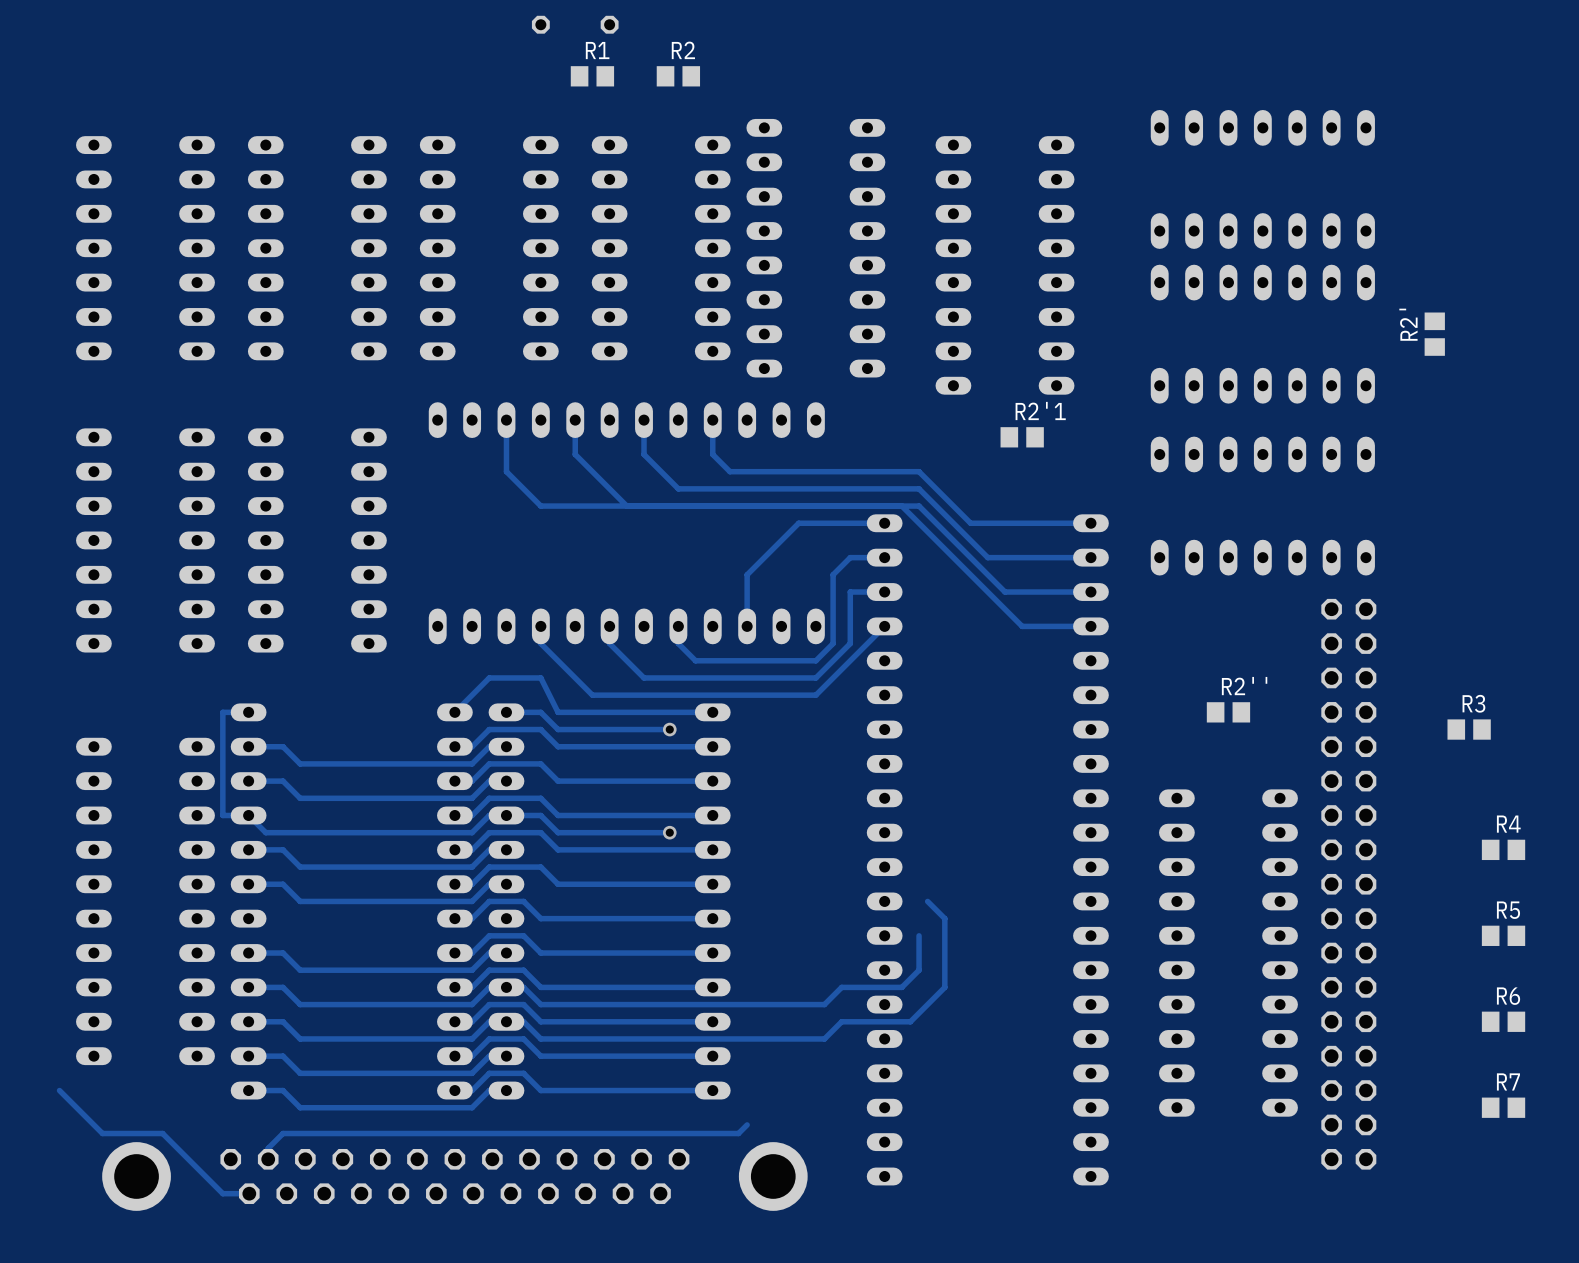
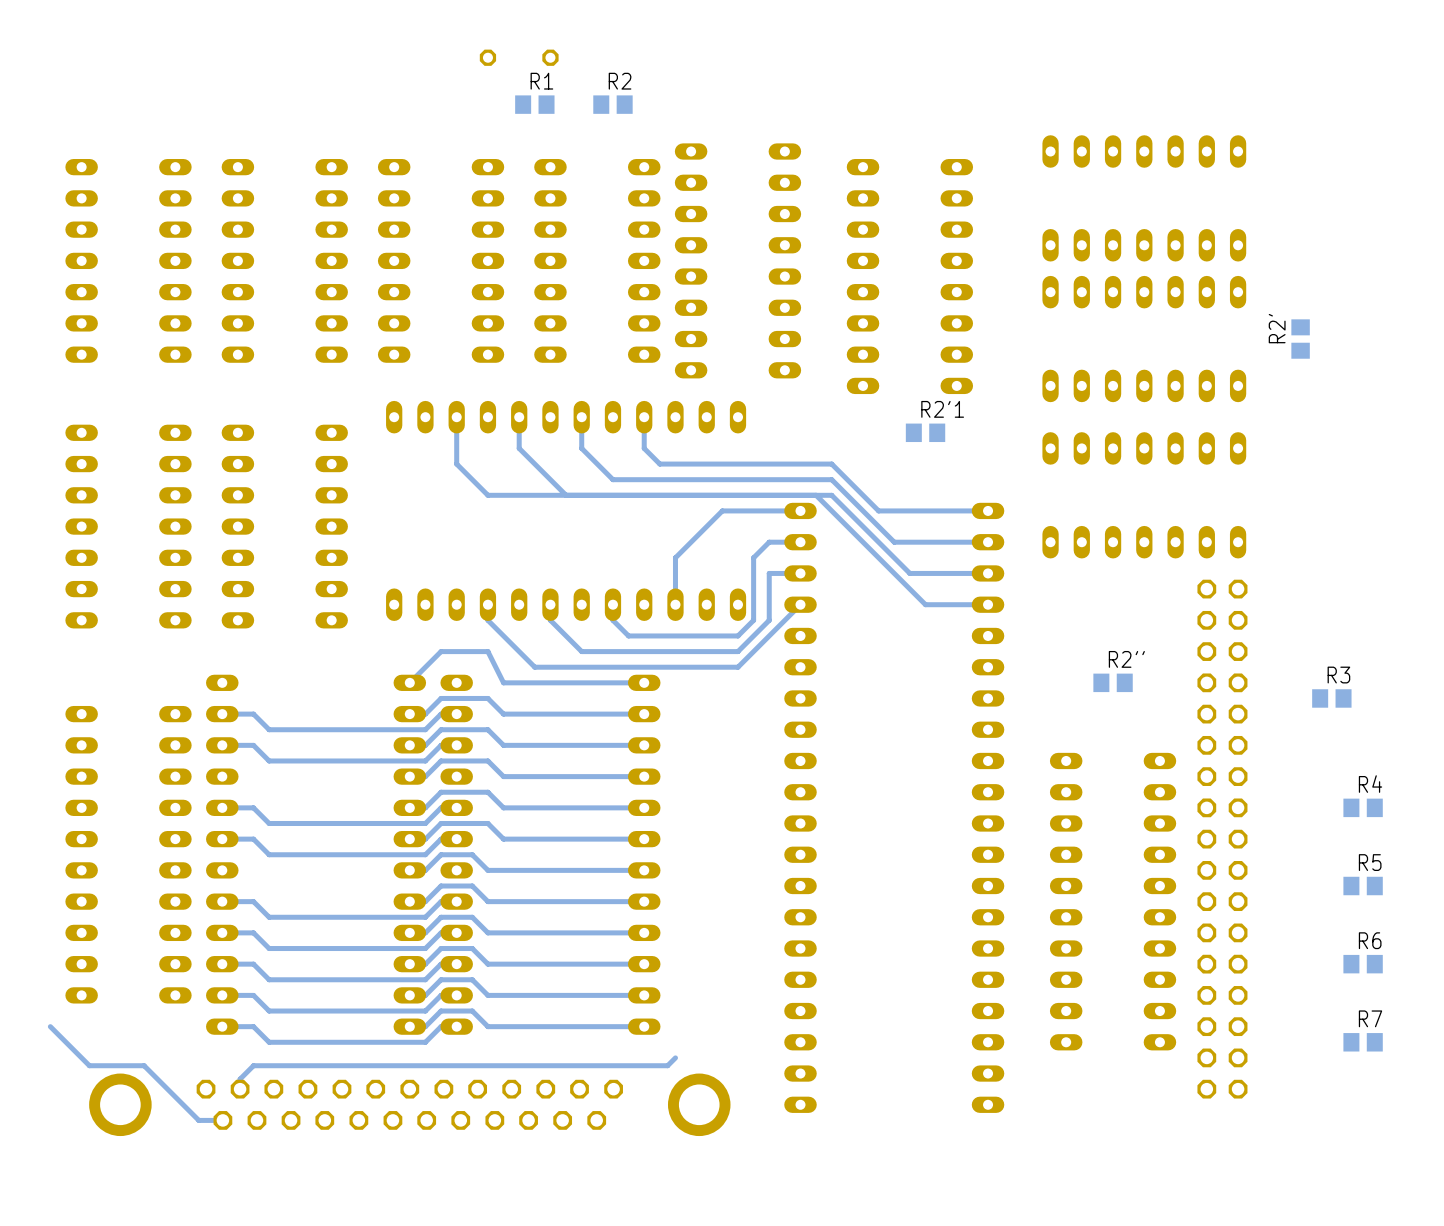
track: (248, 712) (222, 712) (222, 815) (248, 815) (265, 832) (472, 832) (489, 815) (540, 815) (558, 832) (669, 832) -> none
track: (506, 712) (540, 712) (558, 729) (669, 729) -> none
via: (669, 729) -> none
via: (669, 832) -> none
track: (927, 901) (944, 918) (944, 987) (910, 1021) (841, 1021) (824, 1038) (540, 1038) (523, 1021) (506, 1021) -> none
track: (919, 935) (919, 970) (901, 987) (841, 987) (824, 1004) (540, 1004) (523, 987) (506, 987) -> none

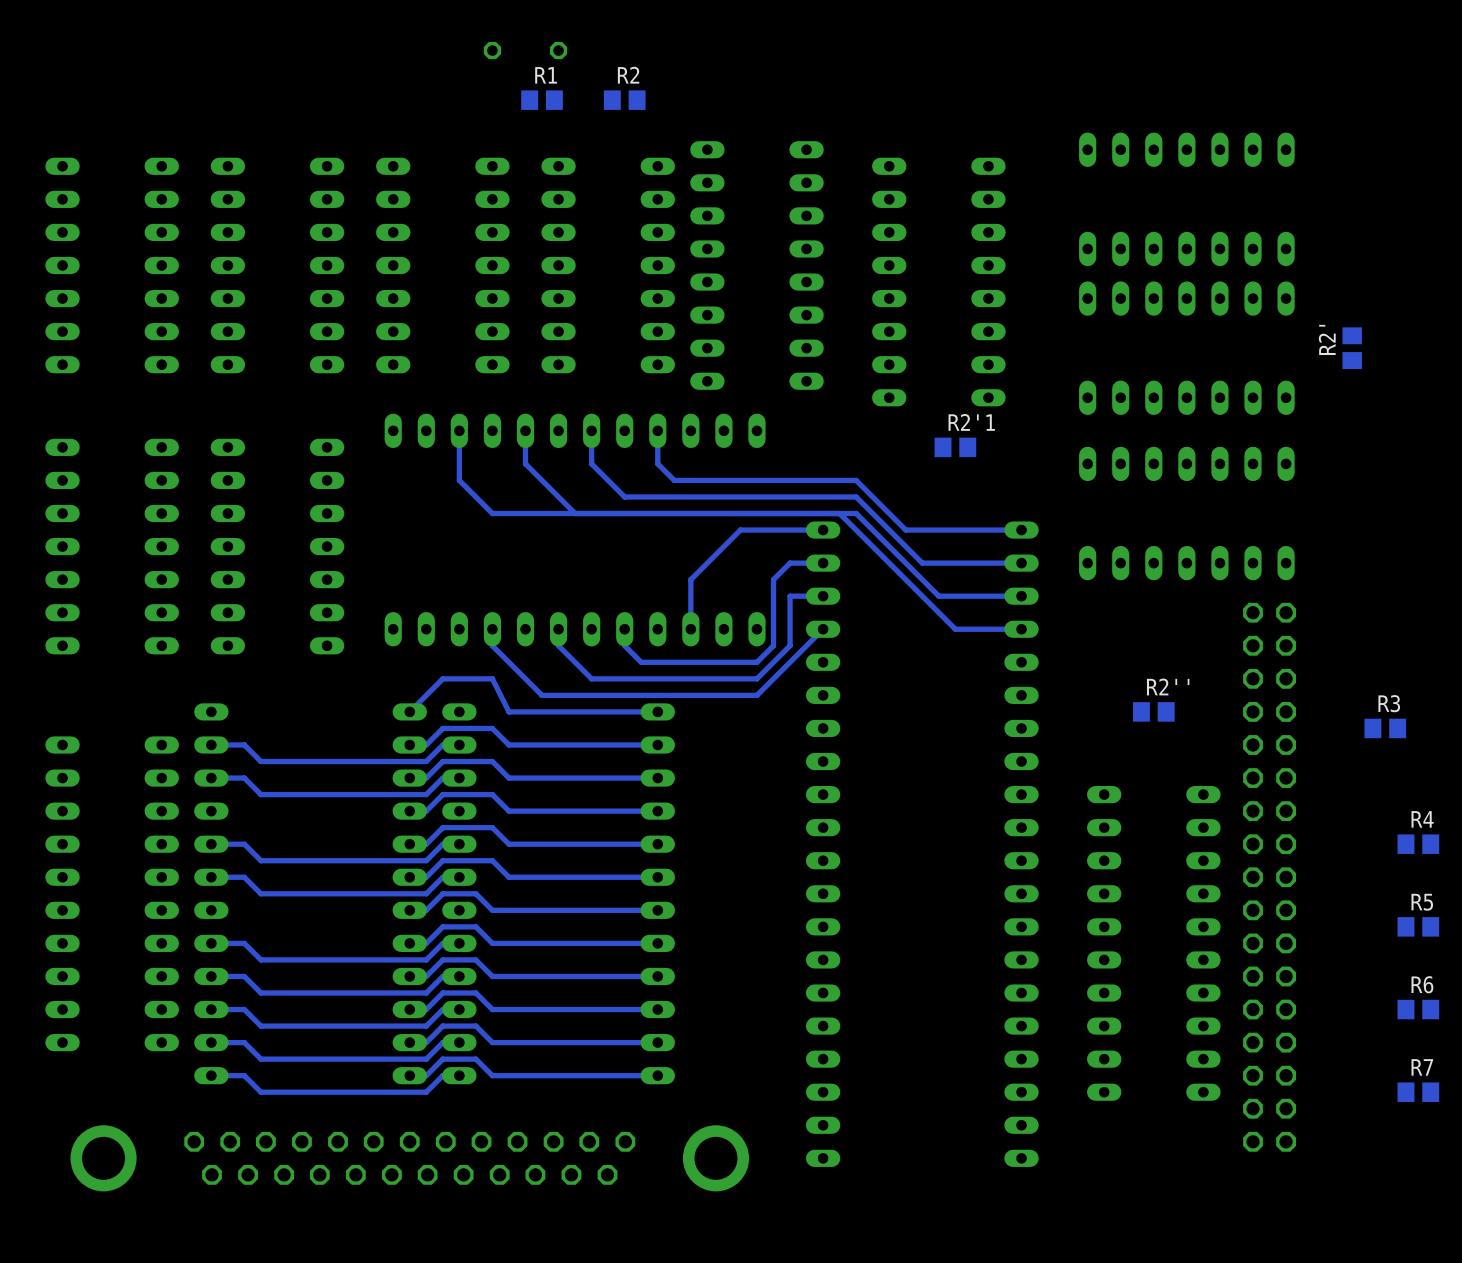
track: (50, 1026) (89, 1065) (144, 1065) (198, 1120) (222, 1120) -> none
track: (675, 1057) (667, 1065) (253, 1065) (240, 1079) (240, 1089) -> none

